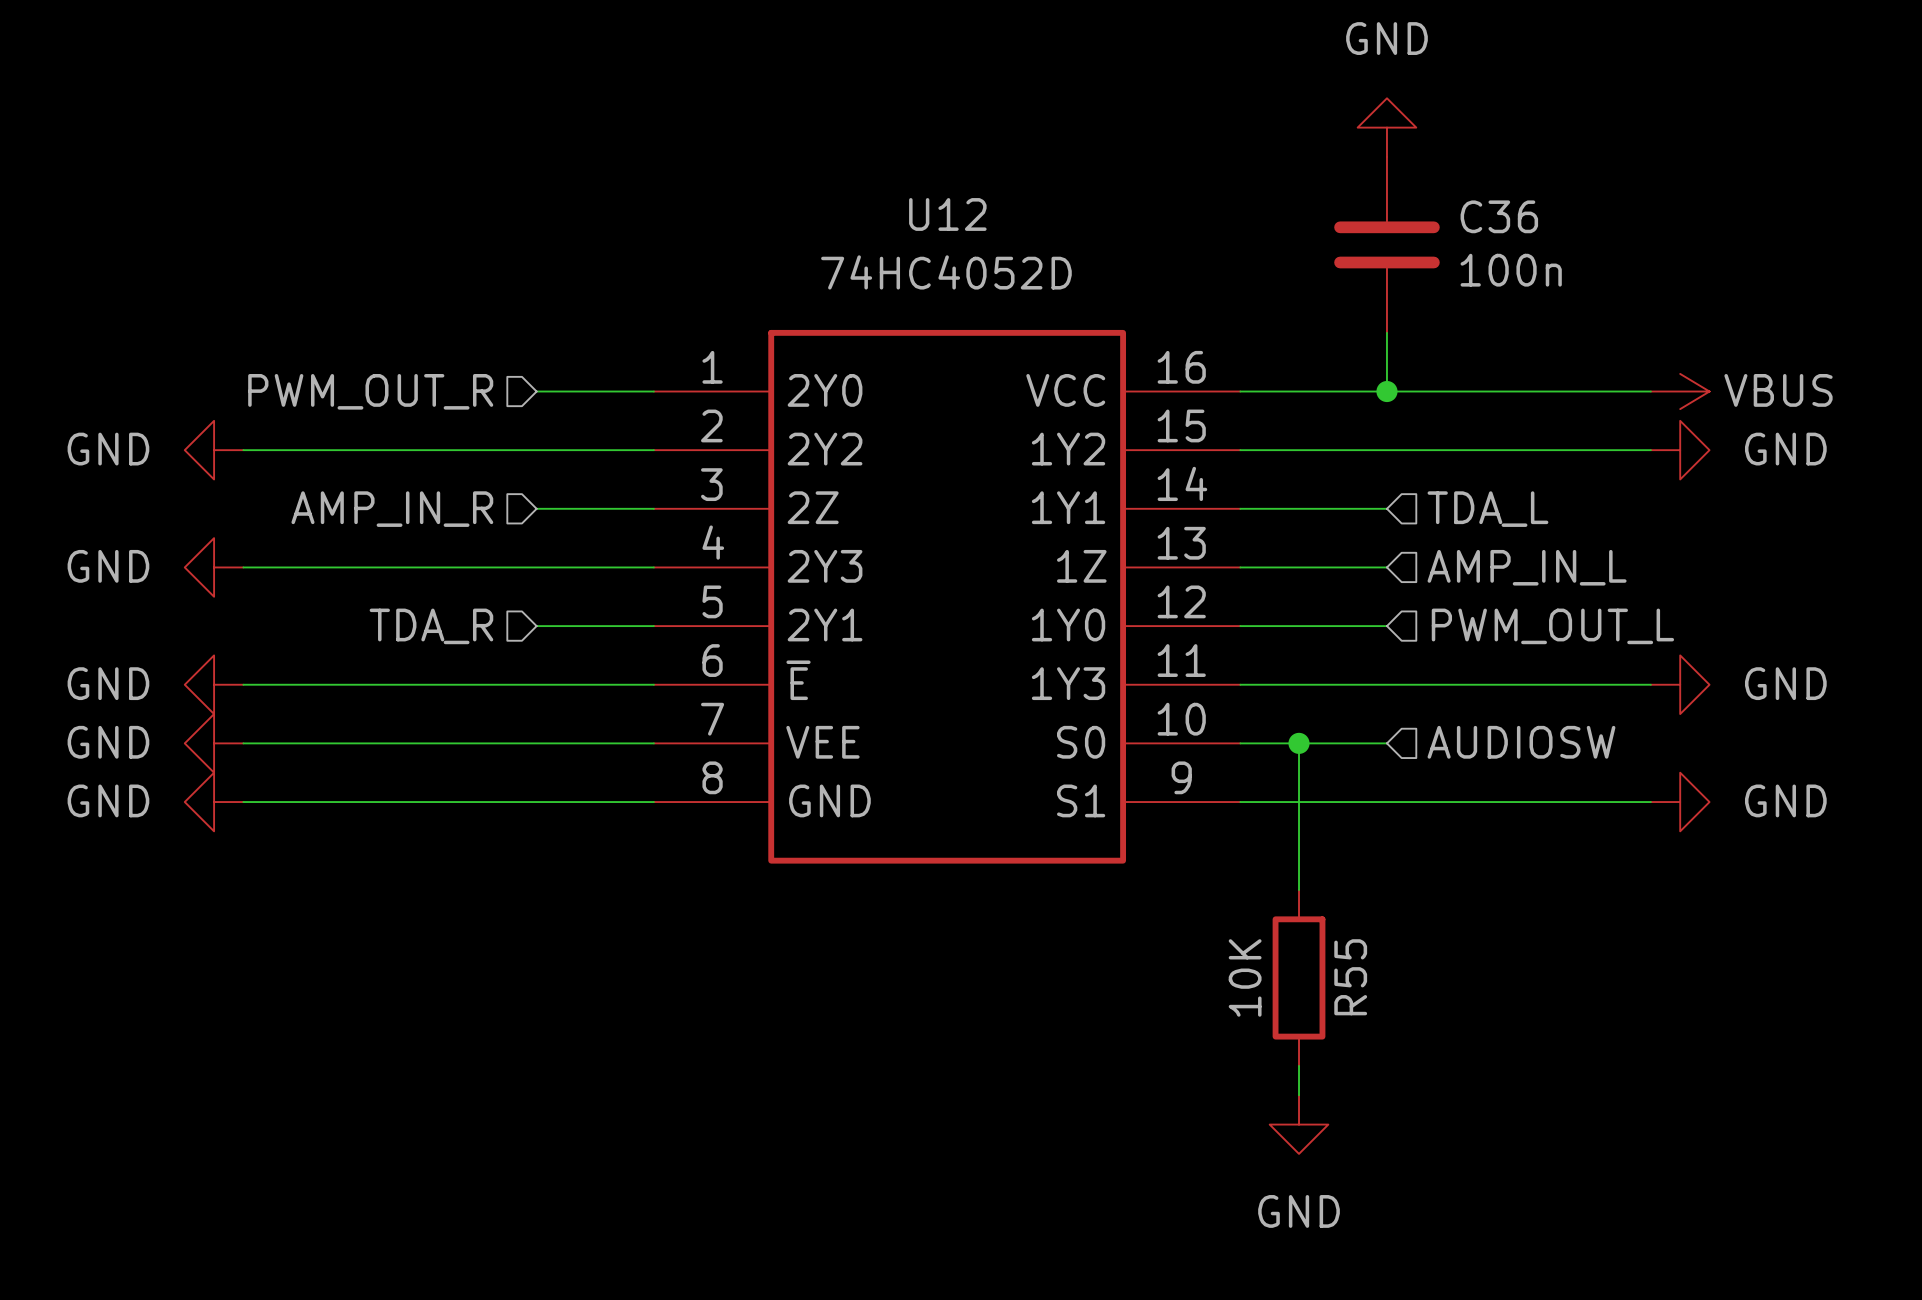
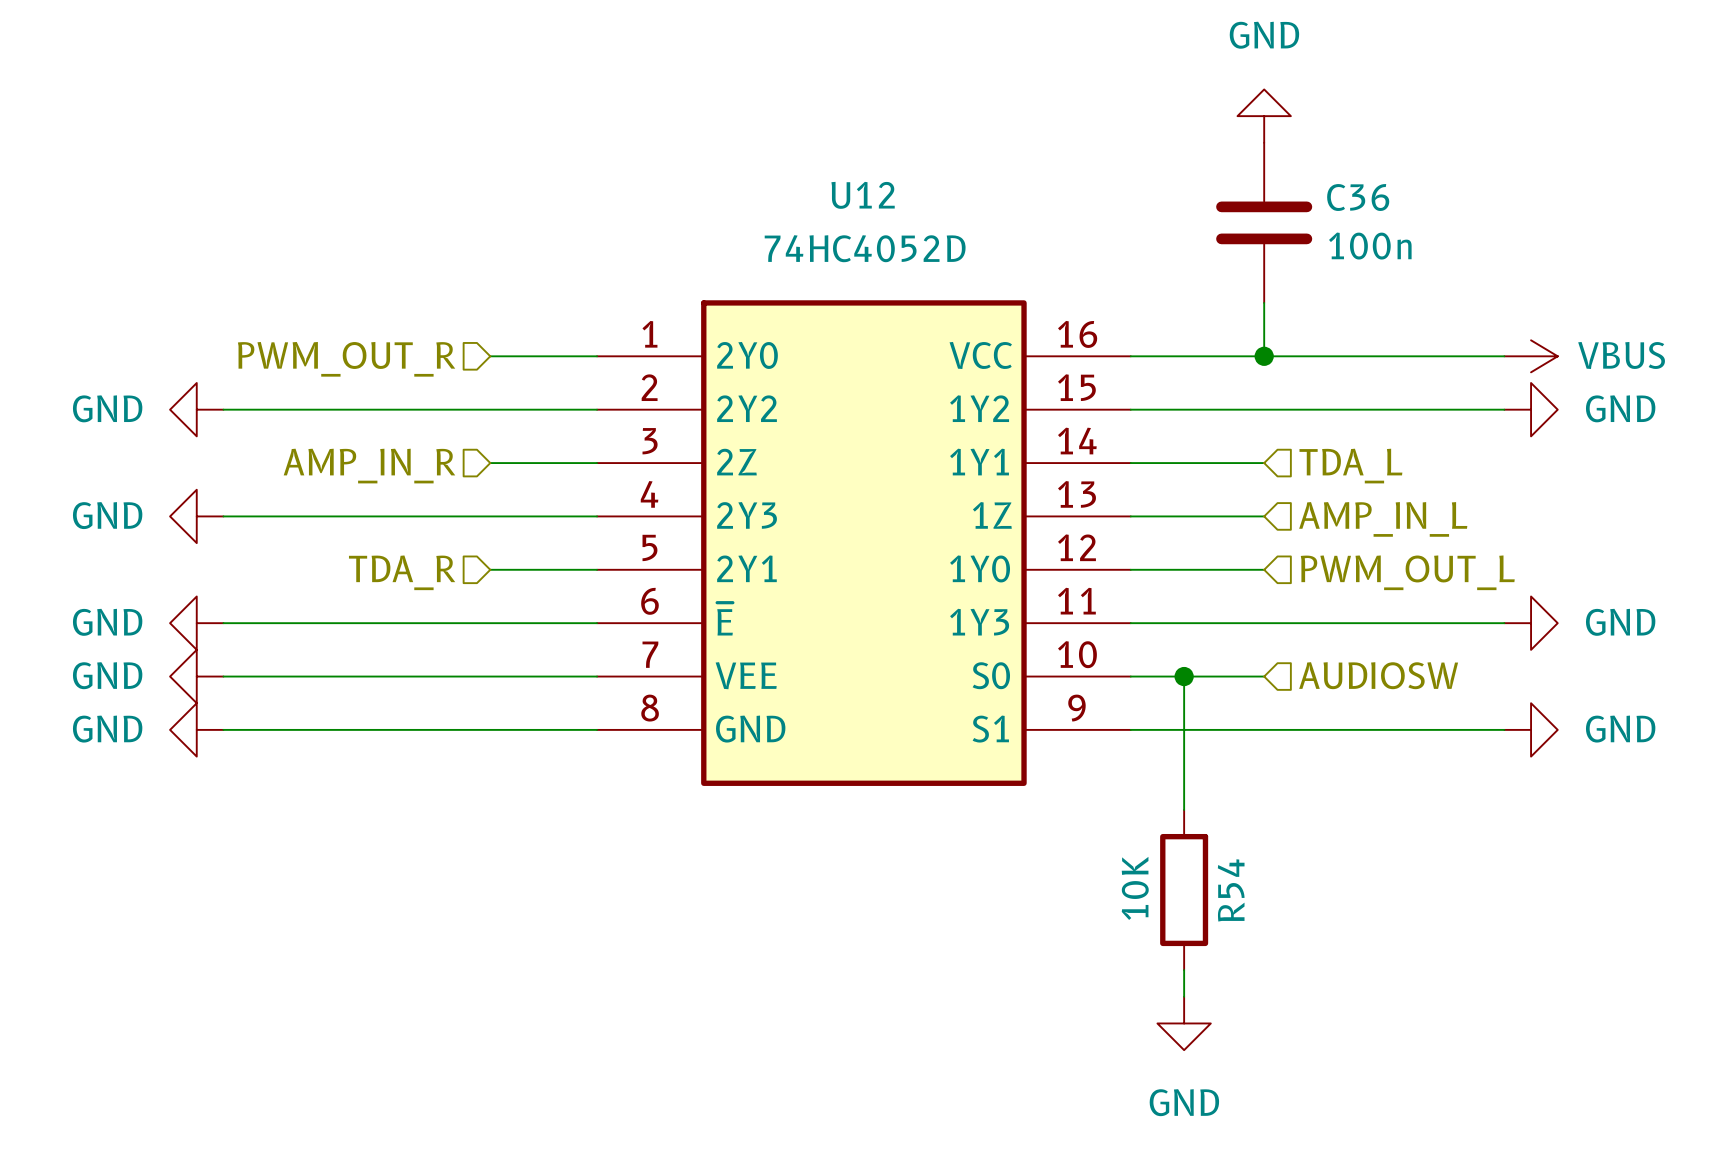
R55 name: R55 (1350, 977) -> R54 (1231, 890)

